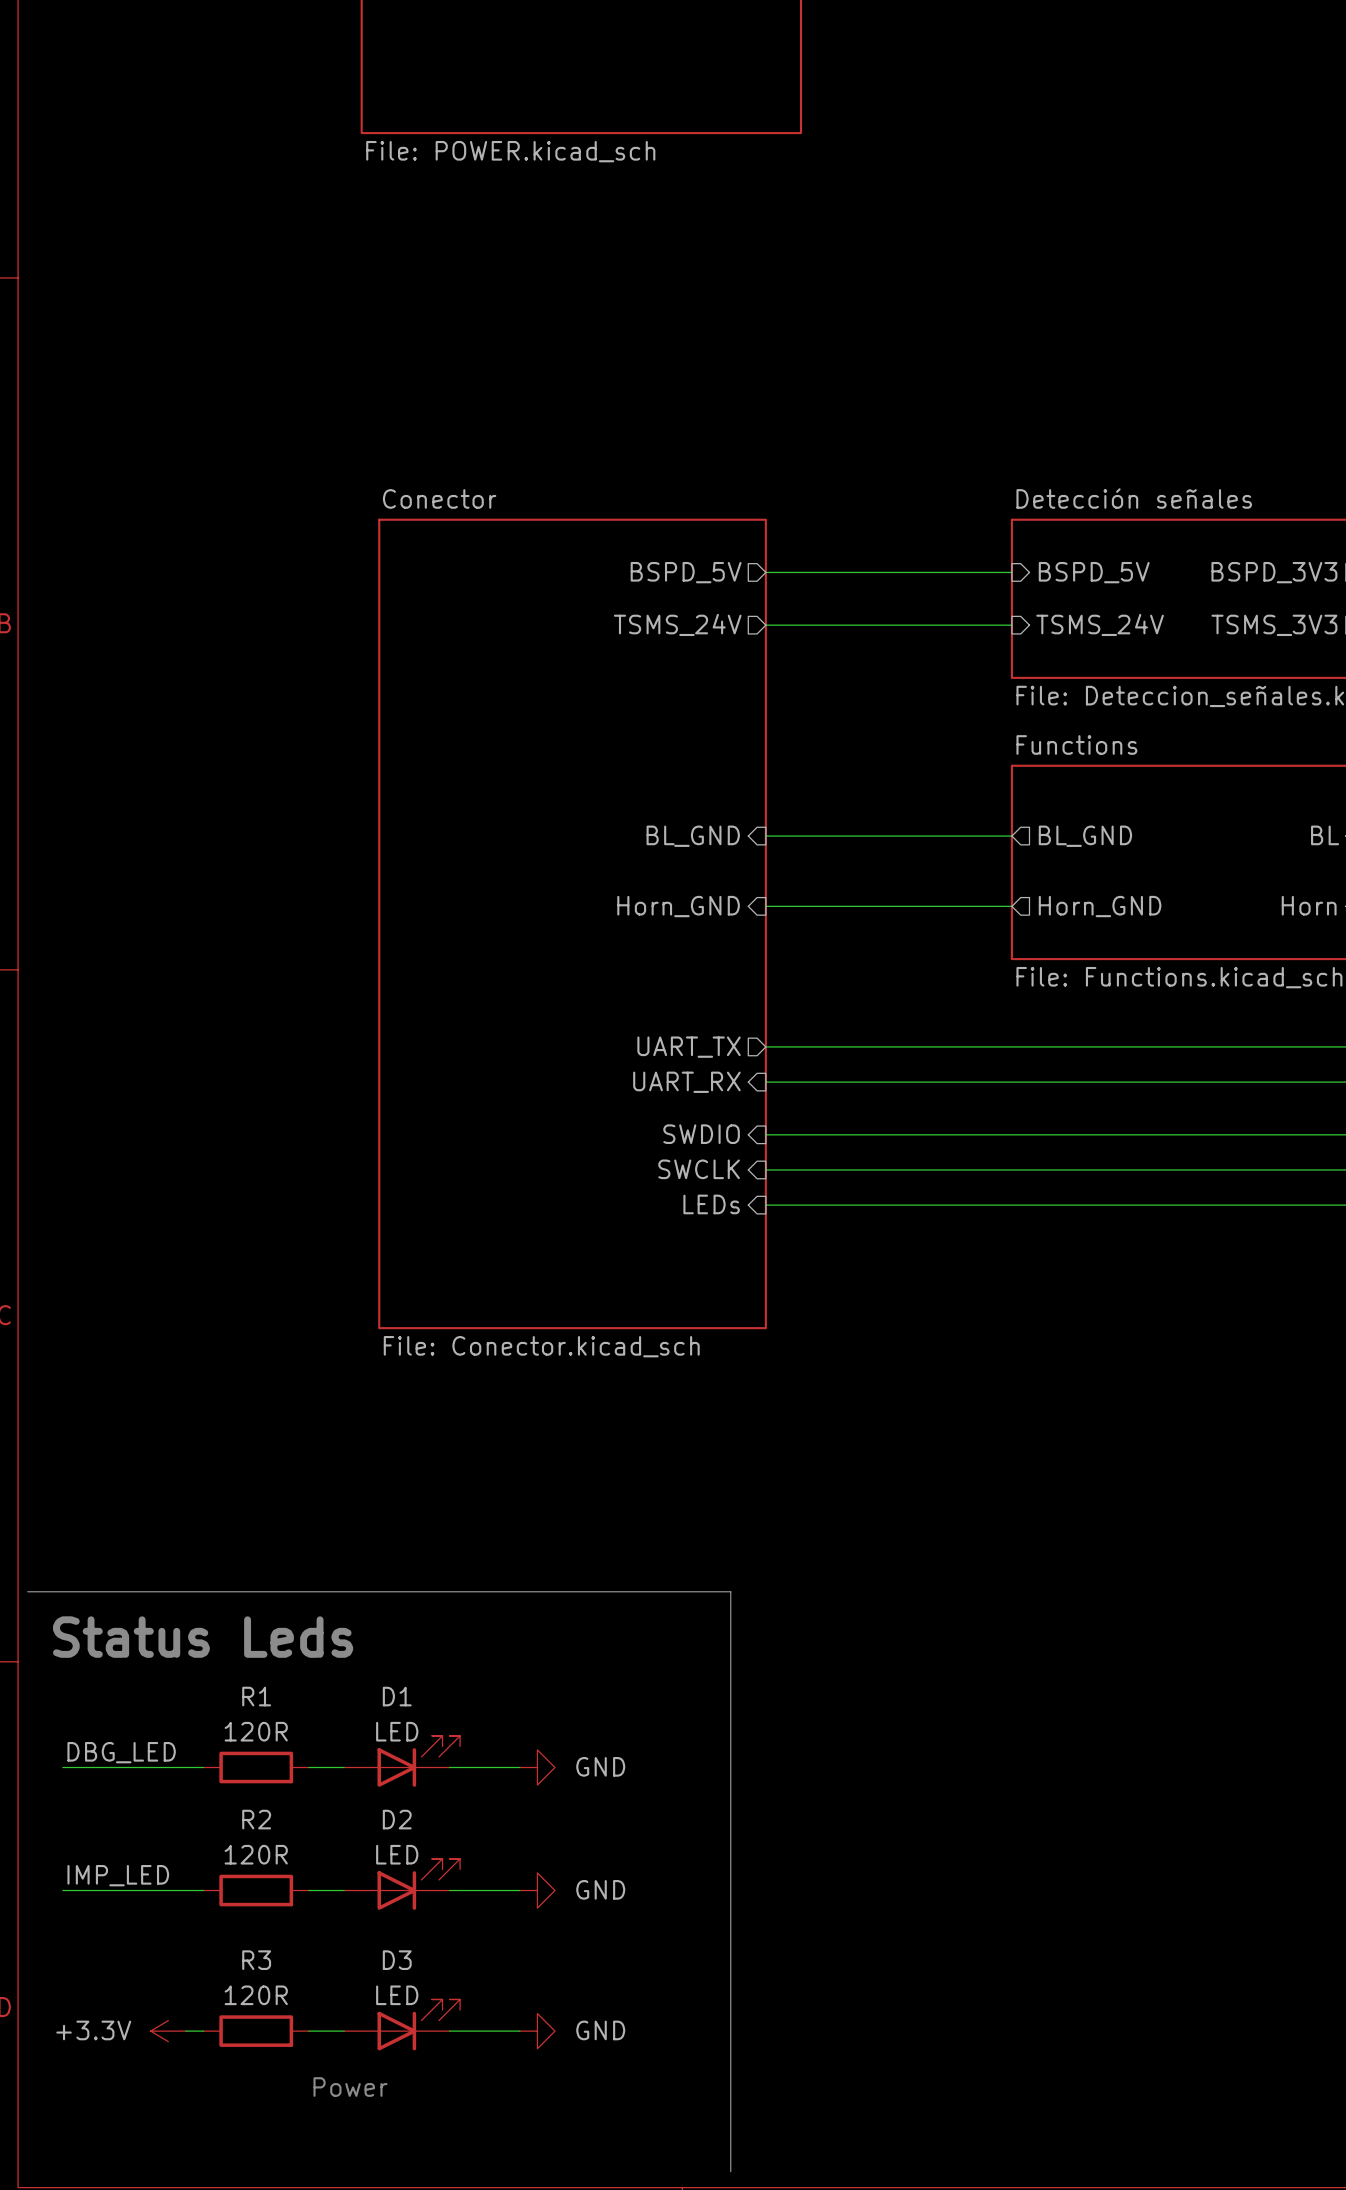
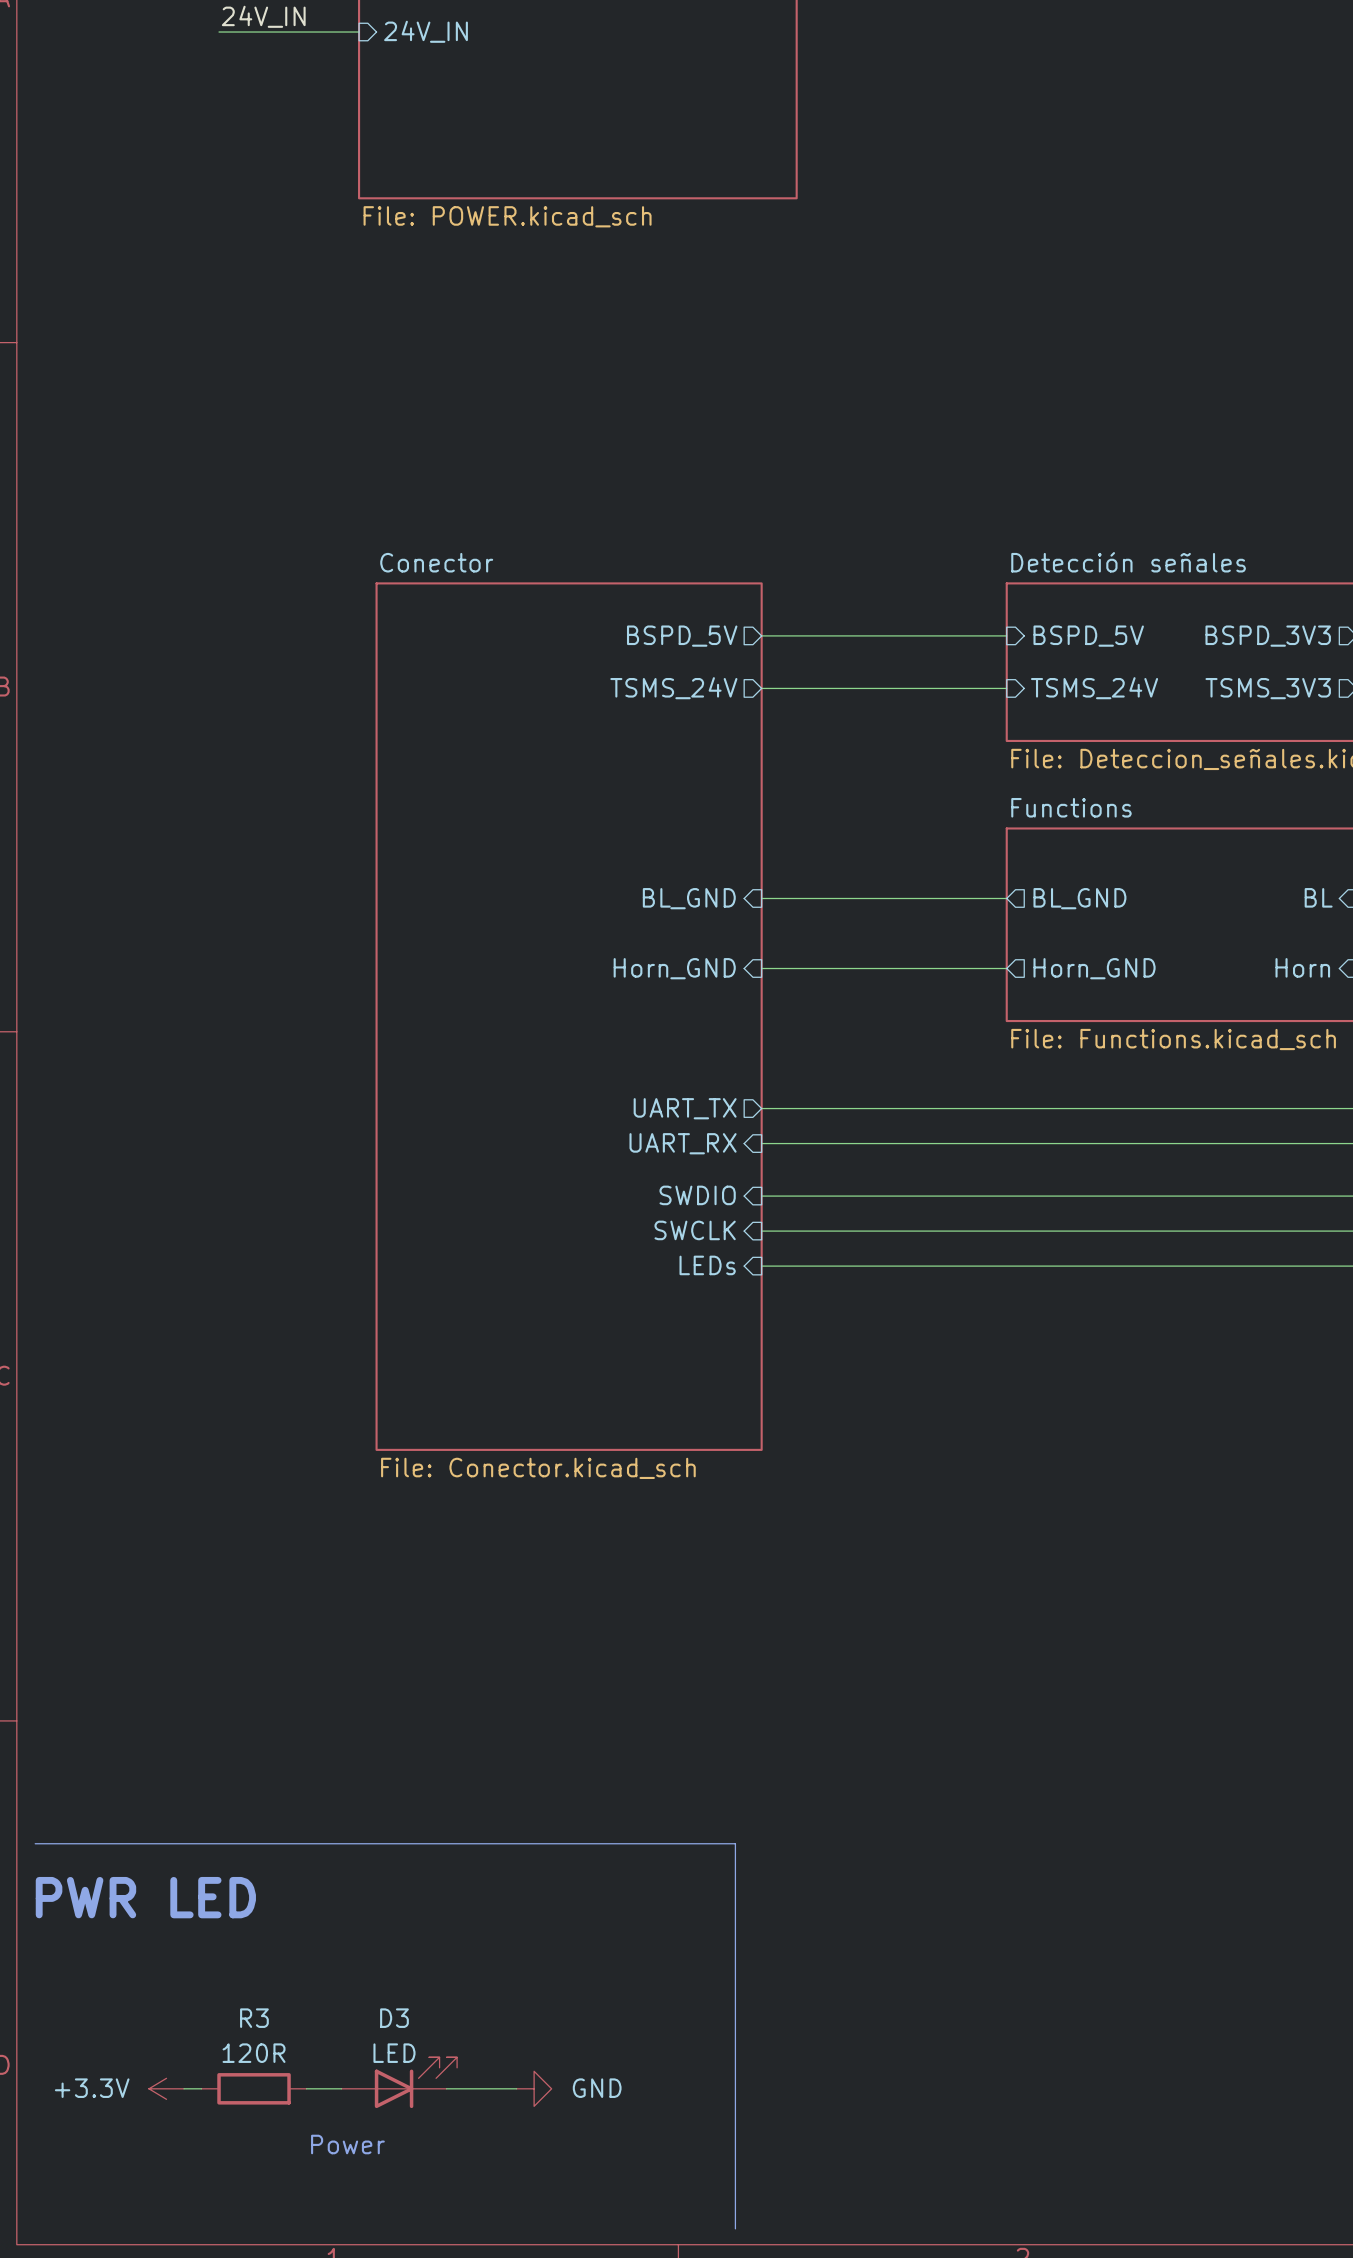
sheet Conector: File: Conector.kicad_sch (572, 923) -> none
sheet Conector: none -> File: Conector.kicad_sch (569, 1016)
line: (27, 1591) (730, 1591) (730, 2171) -> none
text: Status Leds (203, 1637) -> none
label: DBG_LED (121, 1752) -> none
D1: LED (402, 1761) -> none
wire: (62, 1767) (203, 1767) -> none
R1: 120R (256, 1767) -> none
wire: (308, 1767) (344, 1767) -> none
wire: (449, 1767) (519, 1767) -> none
power symbol: GND (537, 1767) -> none
line: none -> (35, 1843) (735, 1843) (735, 2228)
text: none -> PWR LED (145, 1897)
label: IMP_LED (118, 1875) -> none
D2: LED (402, 1884) -> none
wire: (62, 1890) (203, 1890) -> none
R2: 120R (256, 1890) -> none
wire: (308, 1890) (344, 1890) -> none
wire: (449, 1890) (519, 1890) -> none
power symbol: GND (537, 1890) -> none

